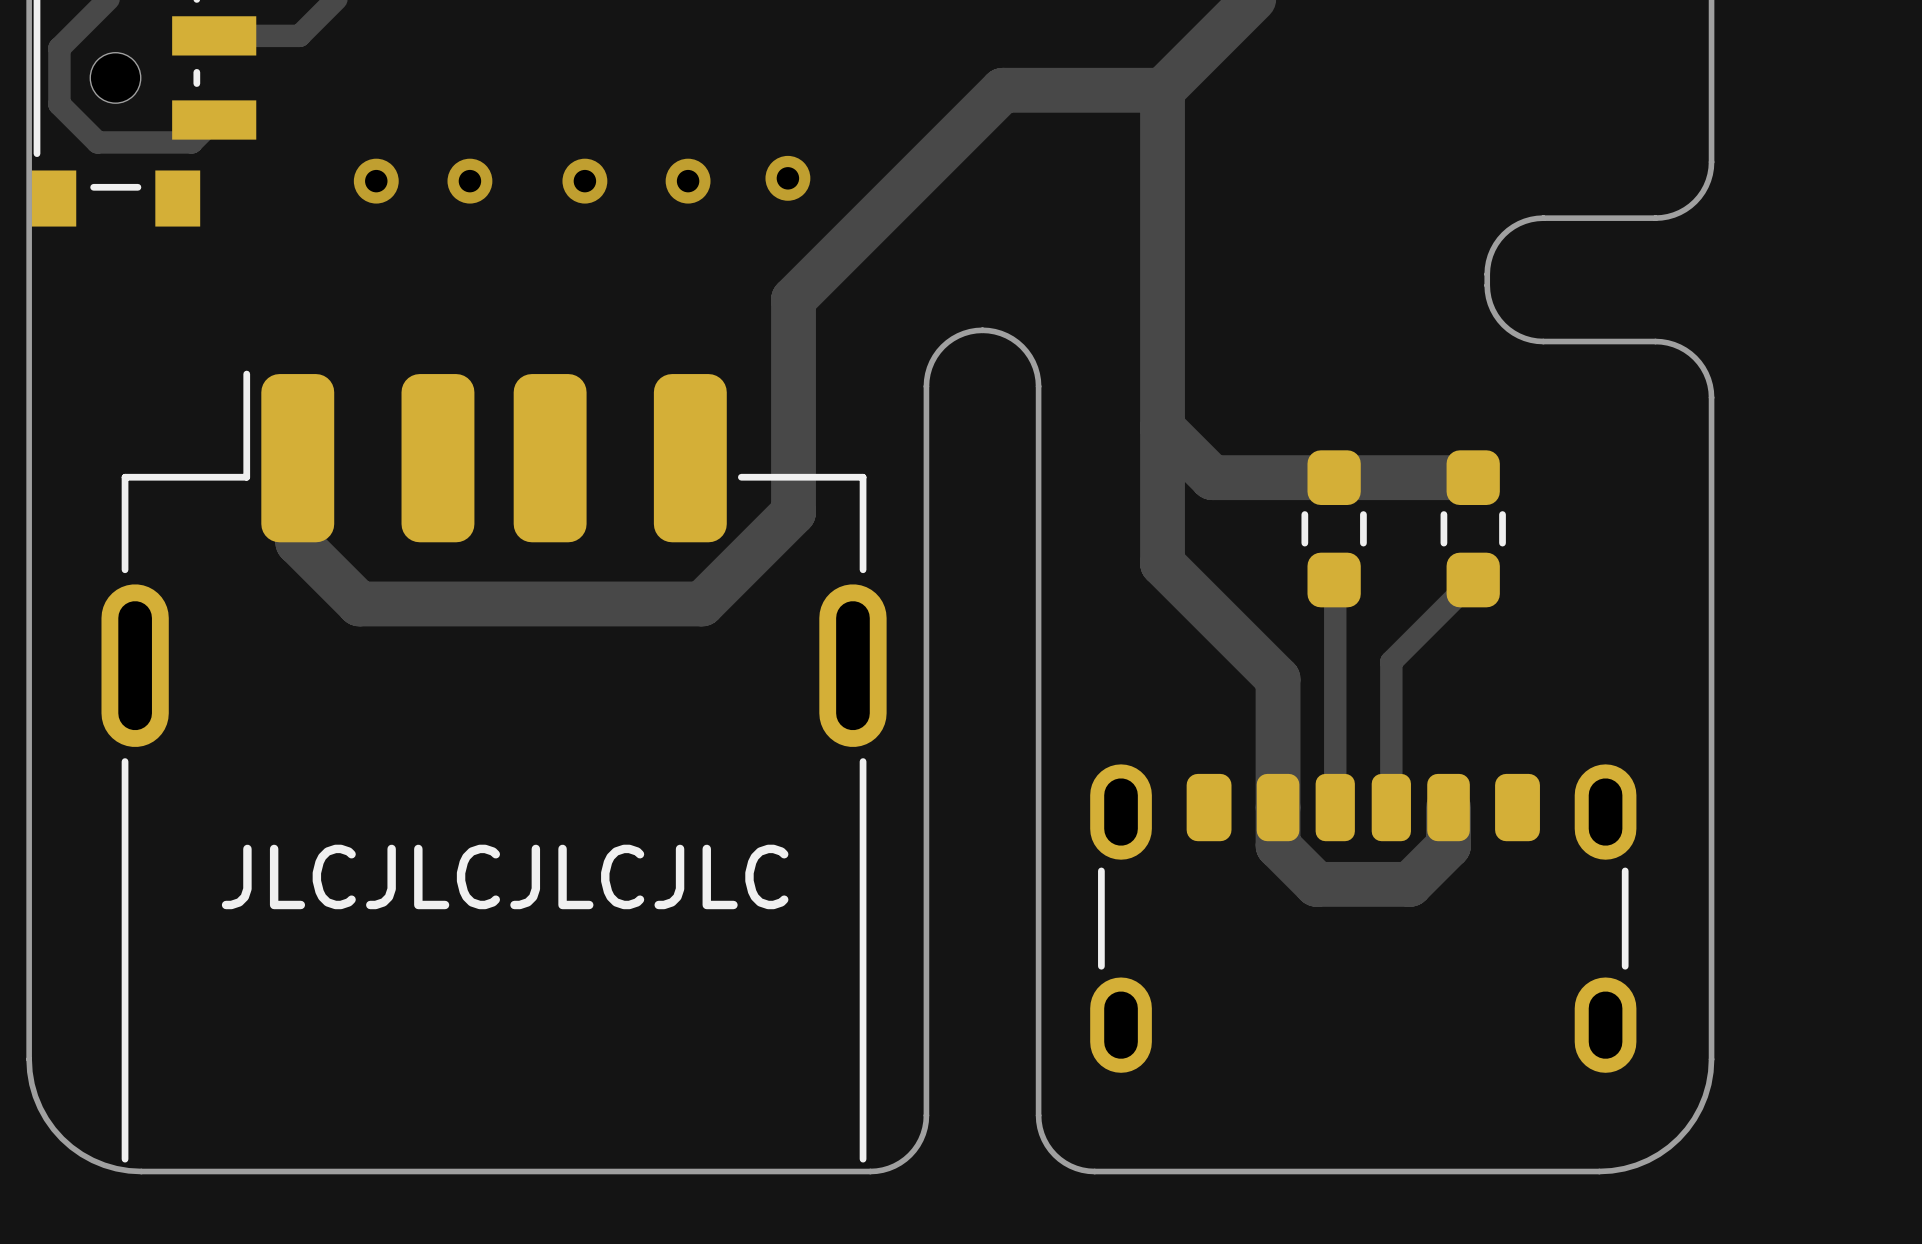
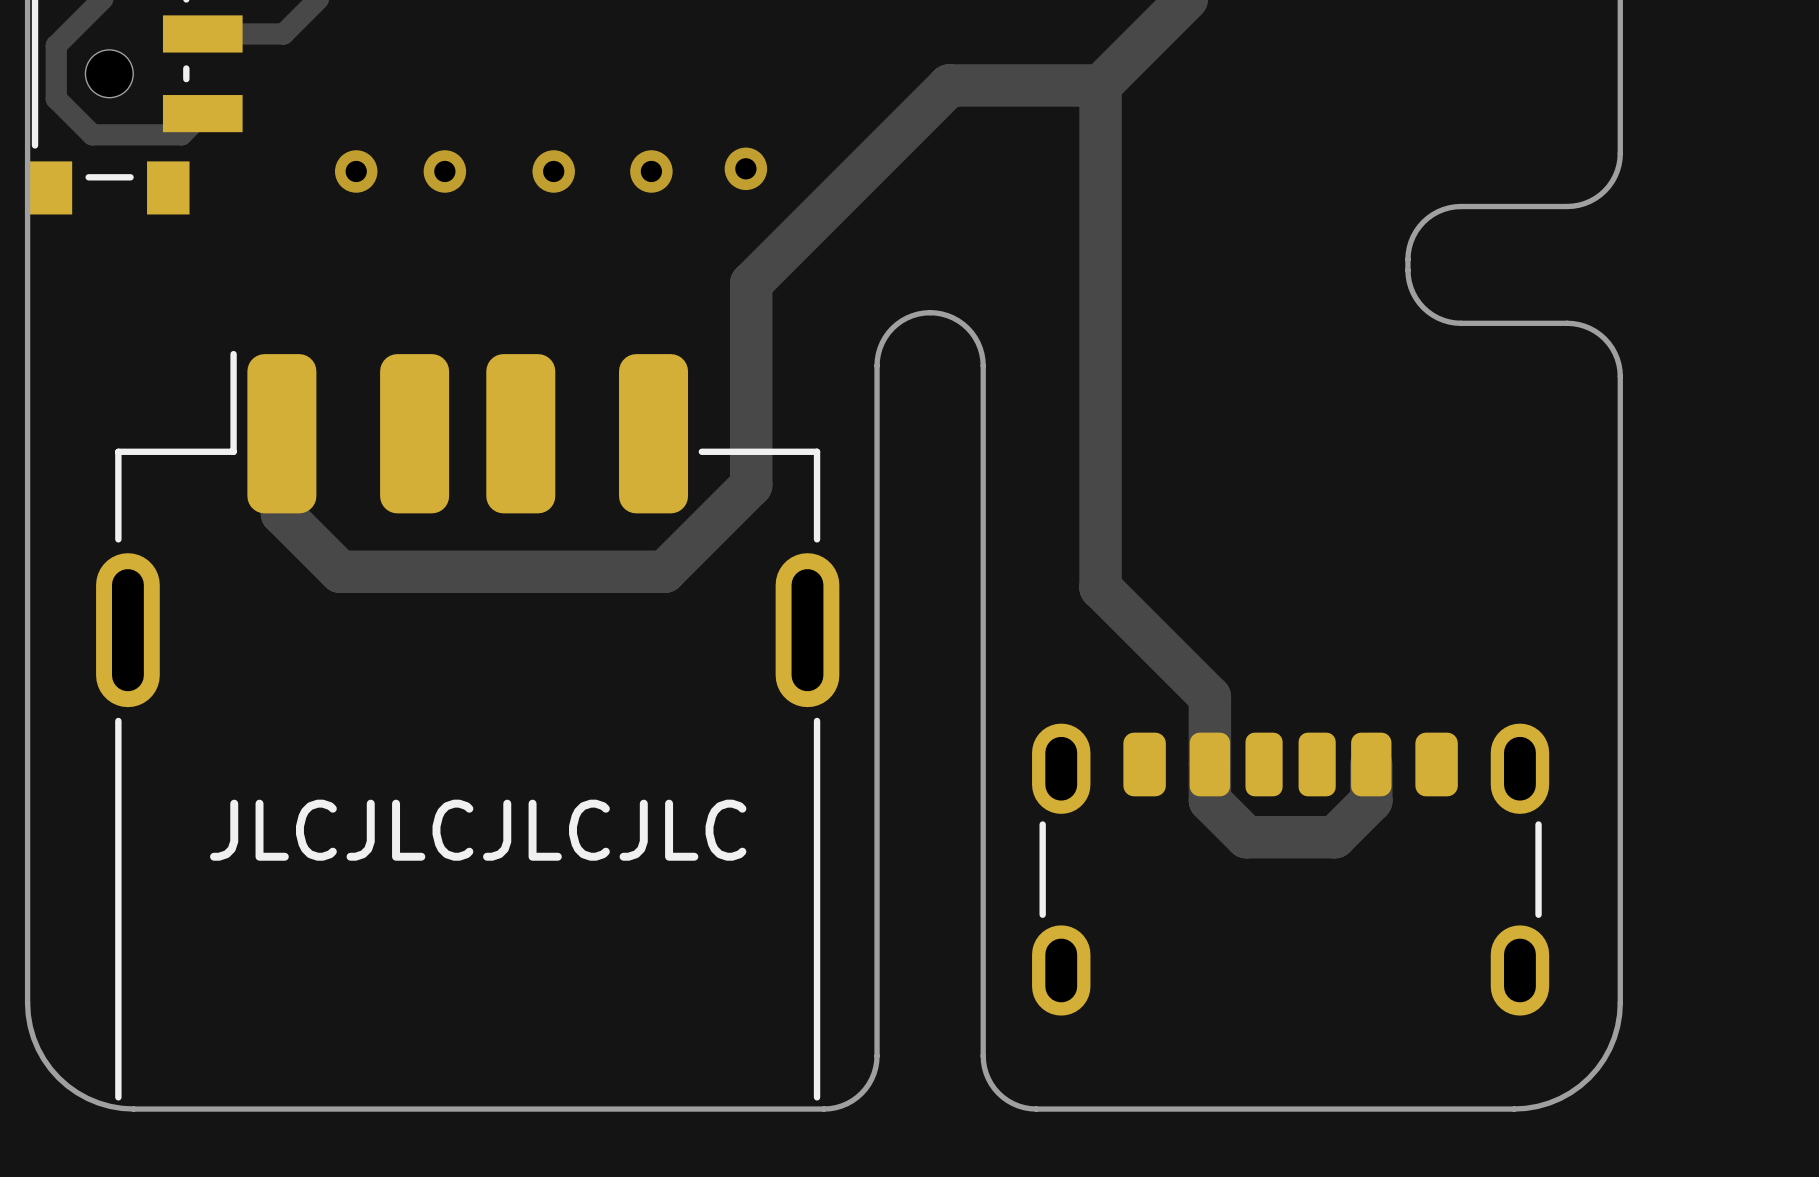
track: (1162, 427) (1212, 477) (1473, 477) -> none
part: (1334, 528) -> none
part: (1473, 528) -> none
track: (1162, 563) (1278, 679) (1278, 736) -> (1100, 533) (1100, 587) (1209, 697)
track: (1334, 580) (1335, 807) -> none
track: (1473, 580) (1391, 661) (1391, 807) -> none

